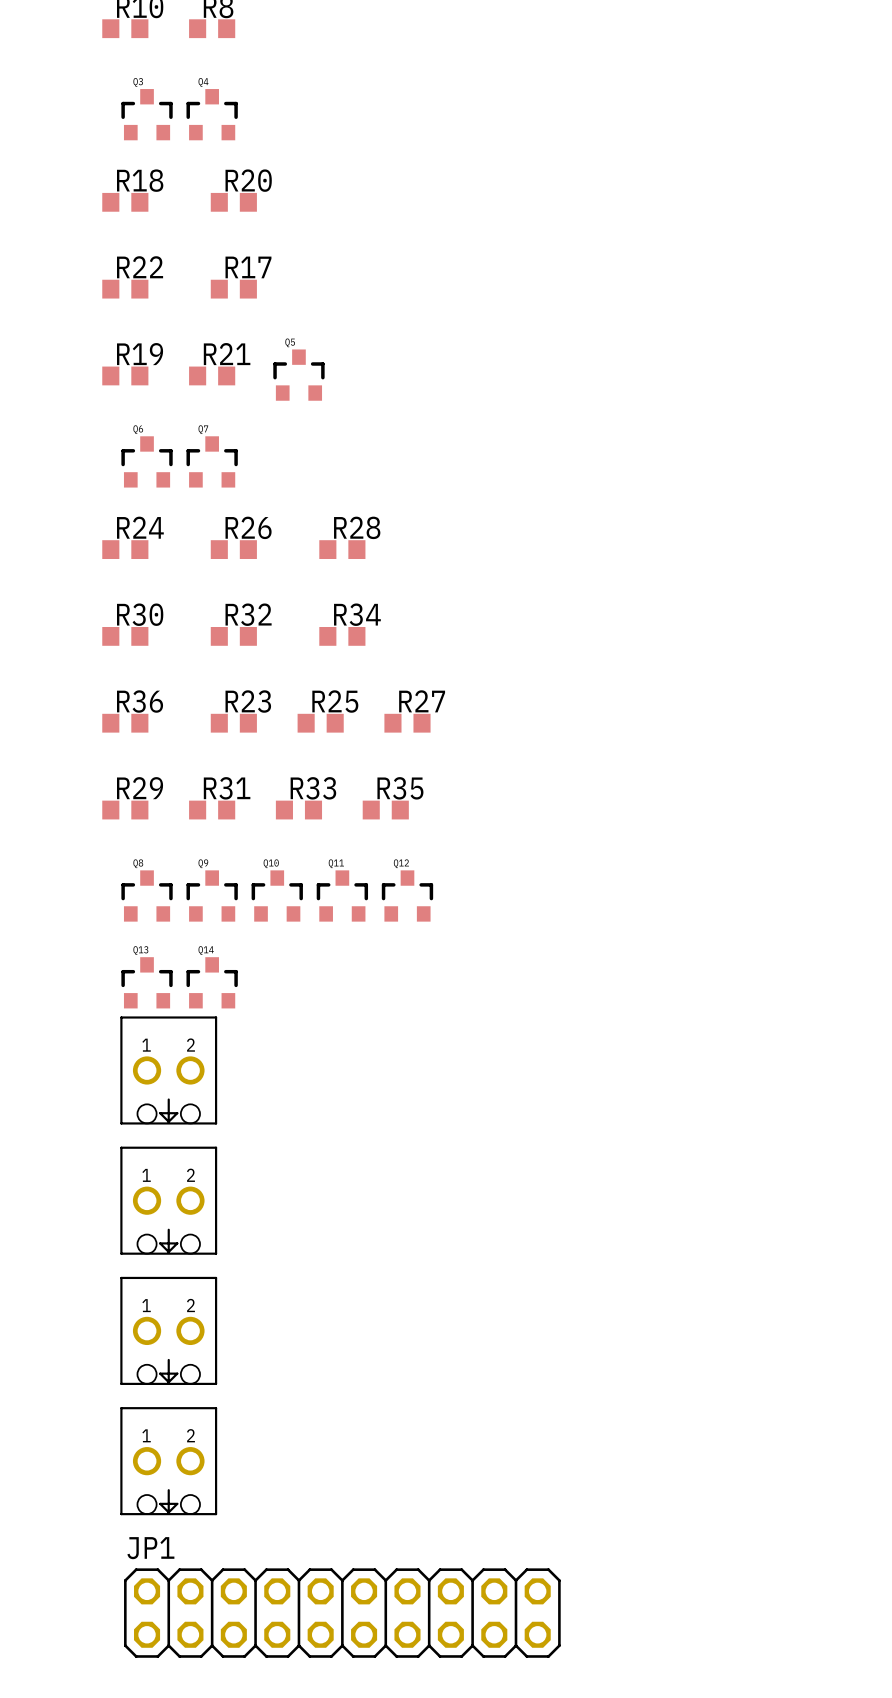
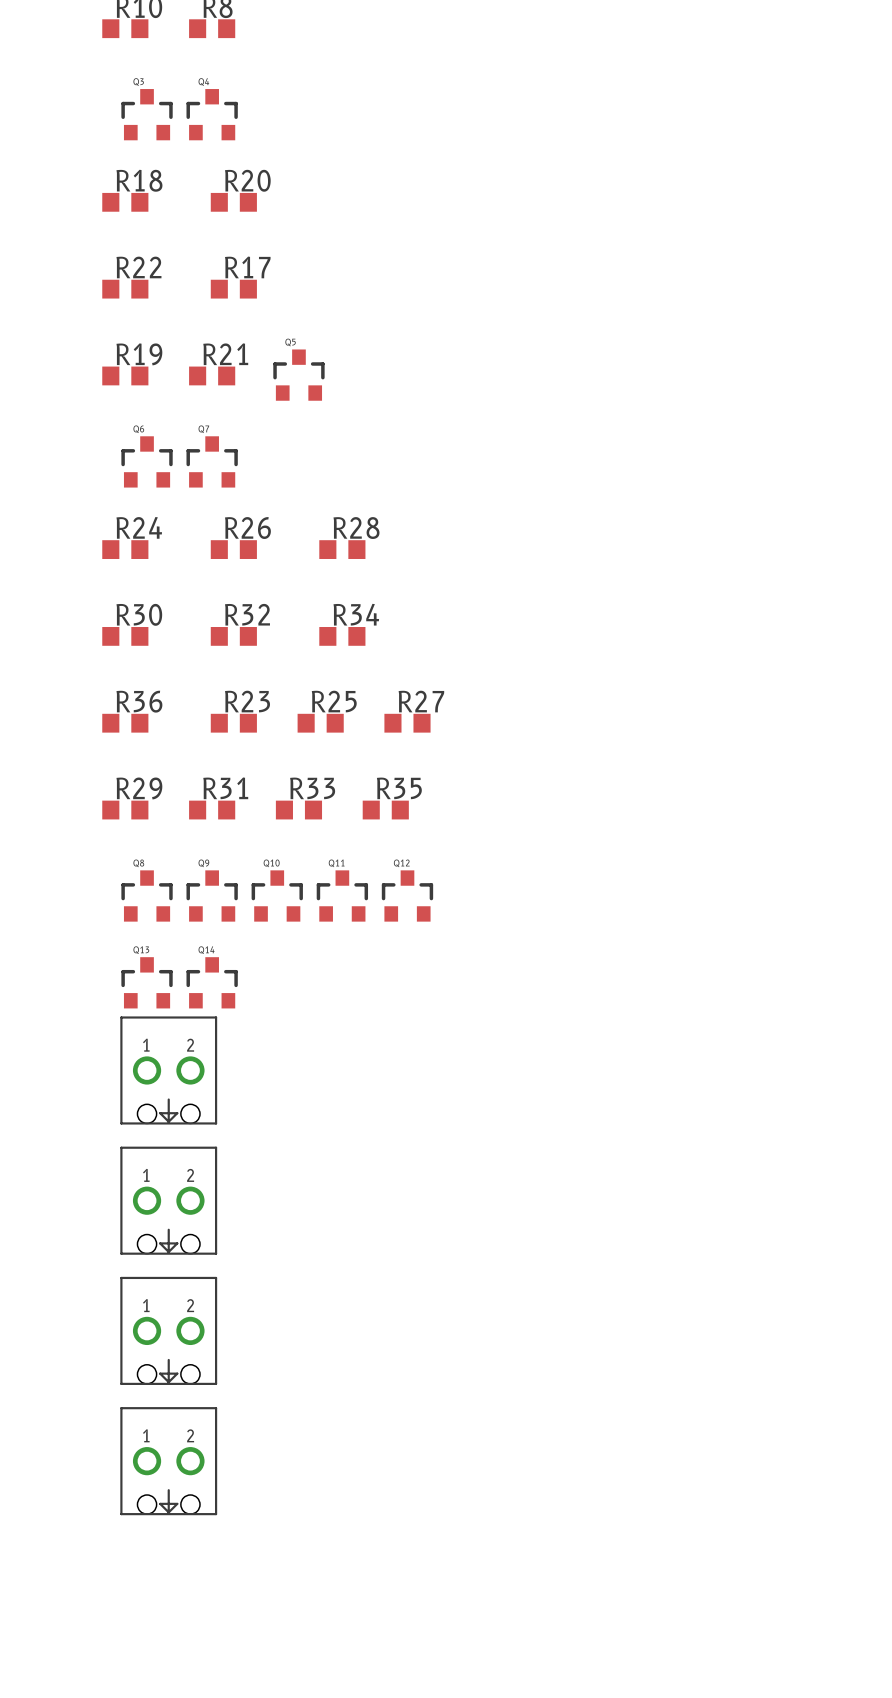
JP1: (342, 1613) -> none

